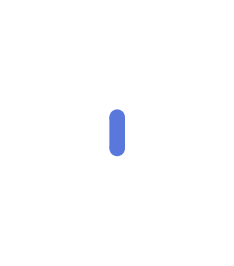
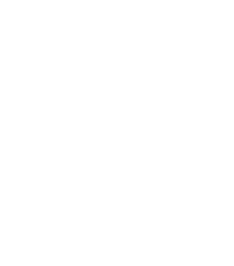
part: (117, 132) -> none

